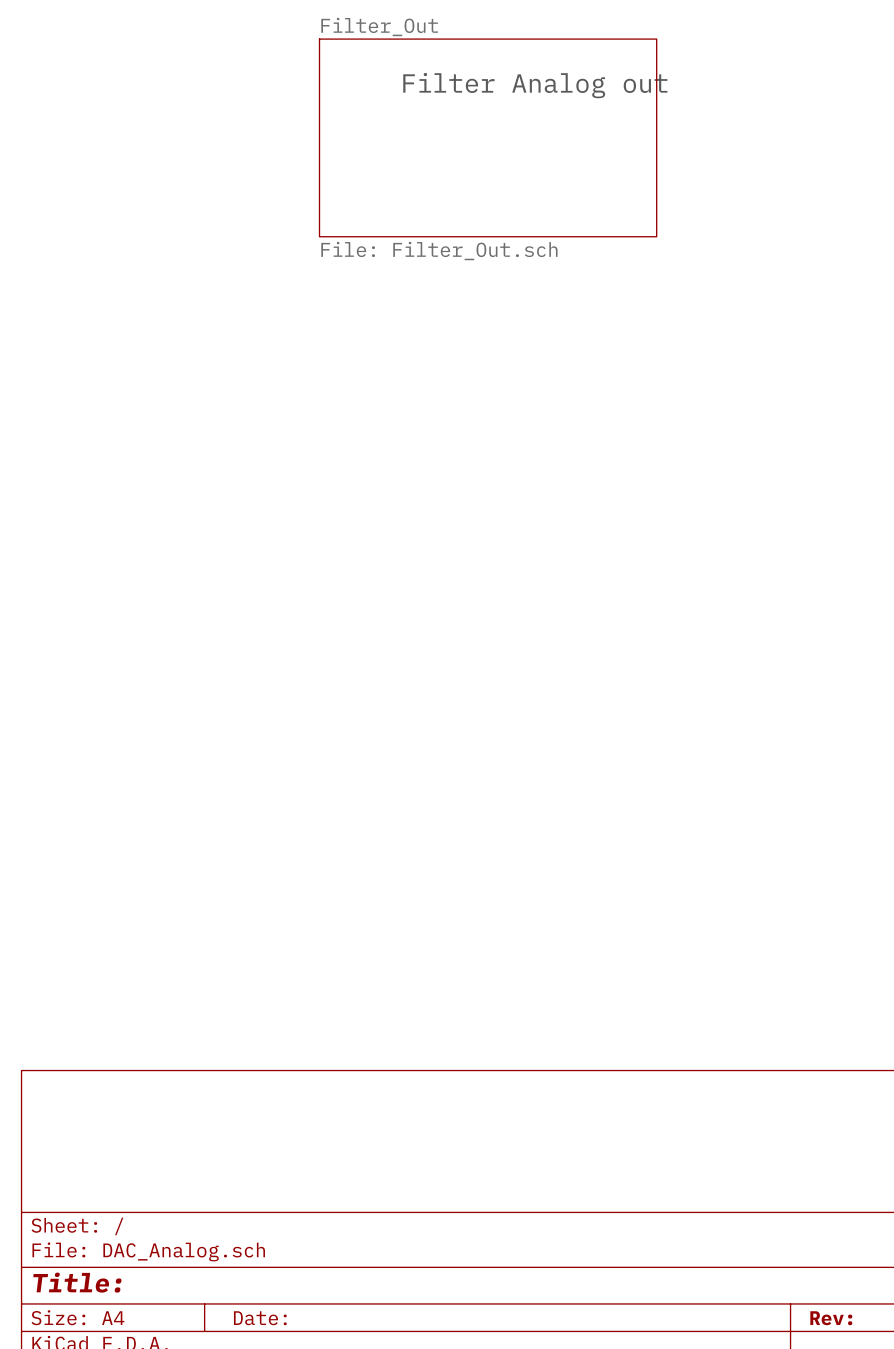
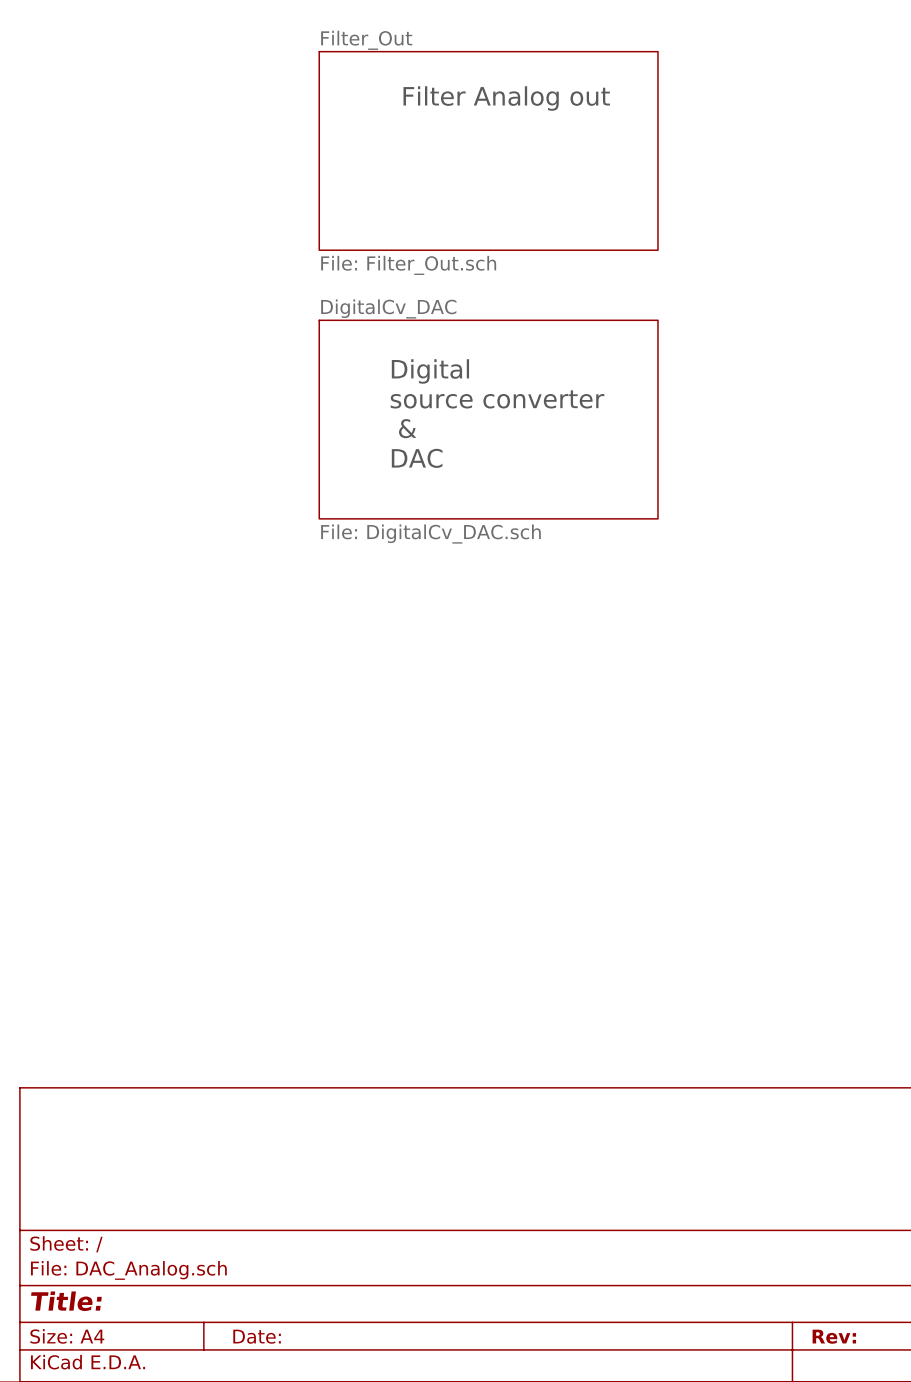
text: none -> Digital (430, 371)
text: none -> source converter (497, 399)
sheet DigitalCv_DAC: none -> File: DigitalCv_DAC.sch (488, 419)
text: none -> & (407, 428)
text: none -> DAC (417, 458)

